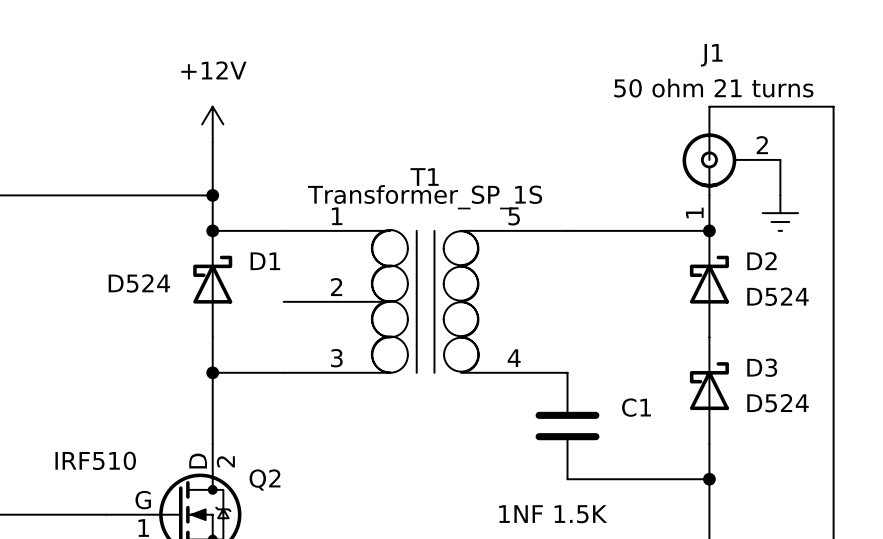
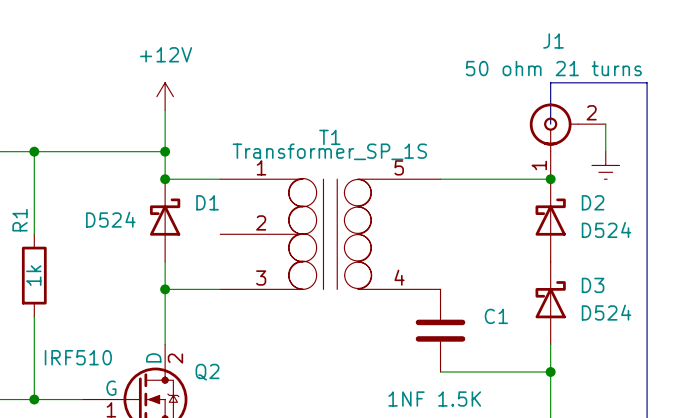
wire: none -> (34, 151) (34, 234)
junction: none -> (34, 151)
R1: none -> 1k (34, 275)
wire: none -> (34, 316) (34, 399)
junction: none -> (34, 399)

